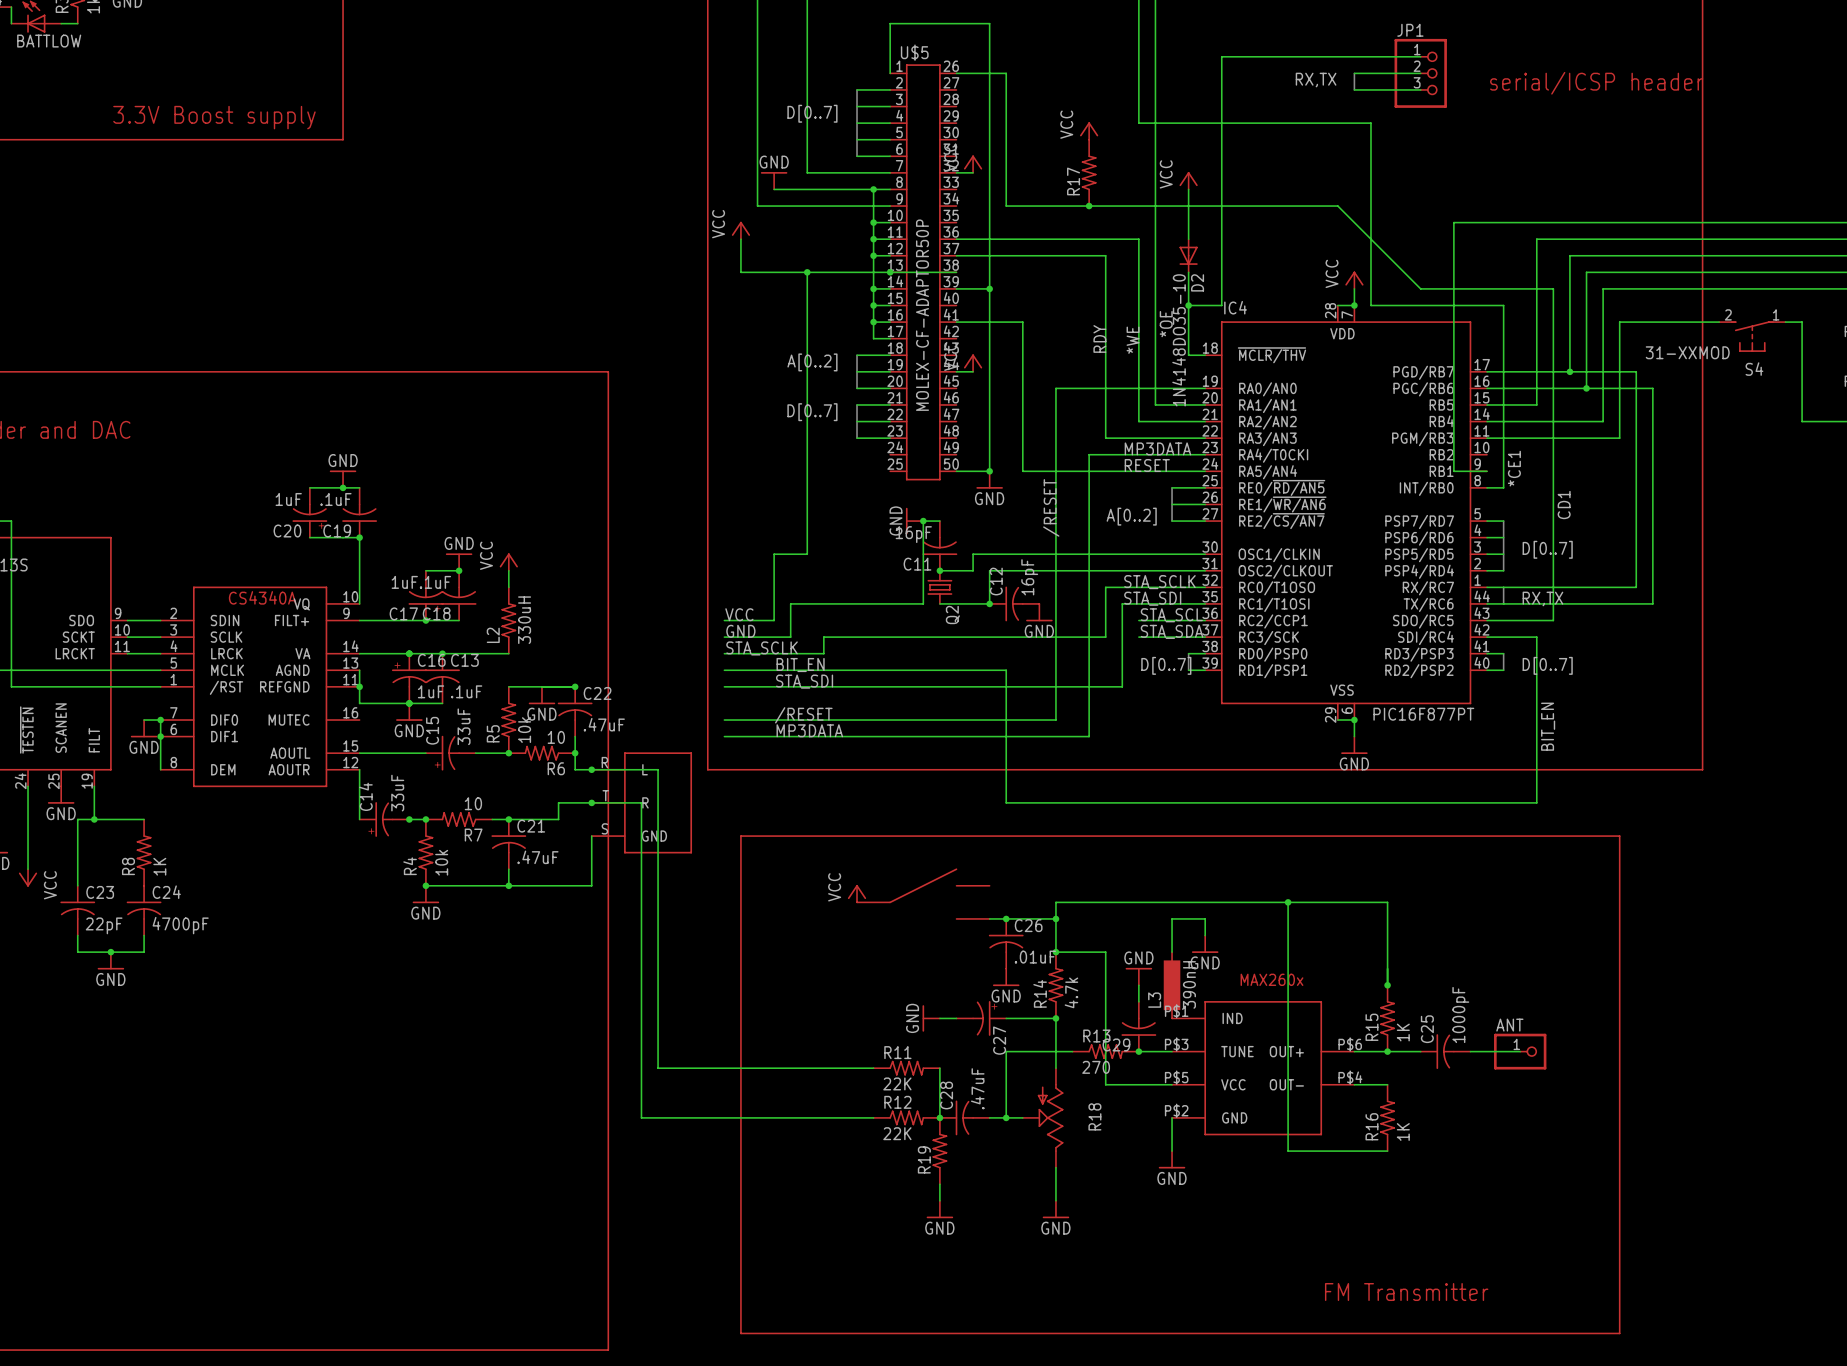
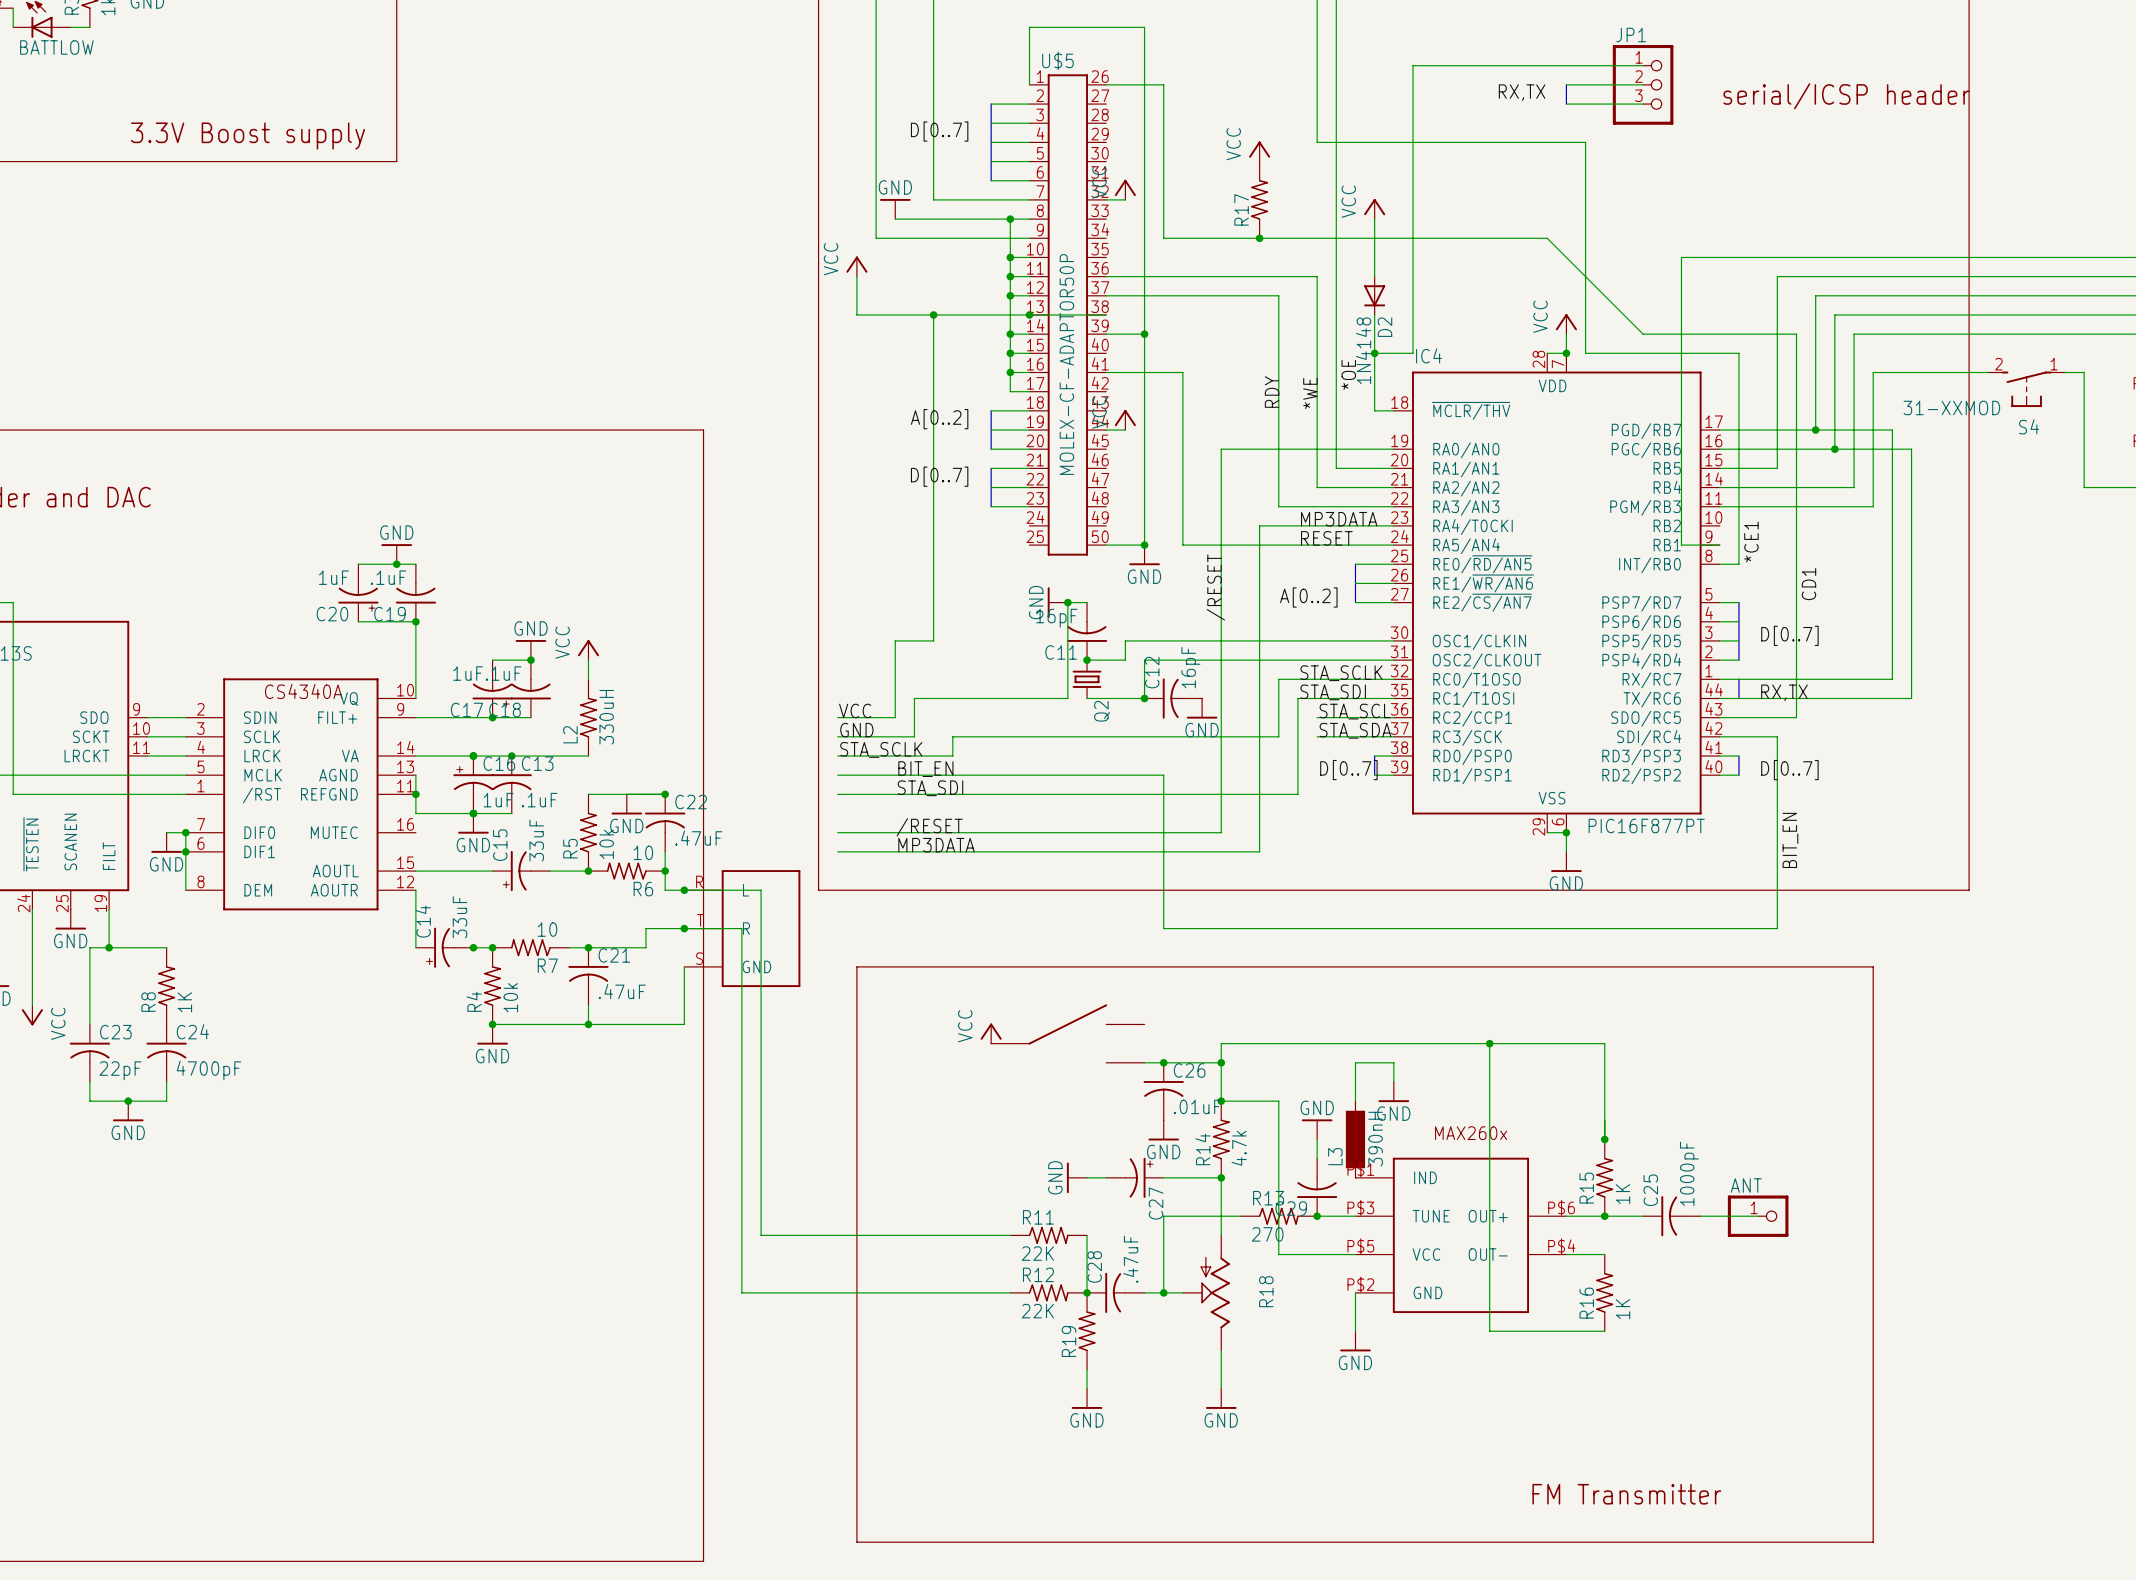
D2 value: 1N4148DO35-10 (1179, 340) -> 1N4148 (1363, 350)

